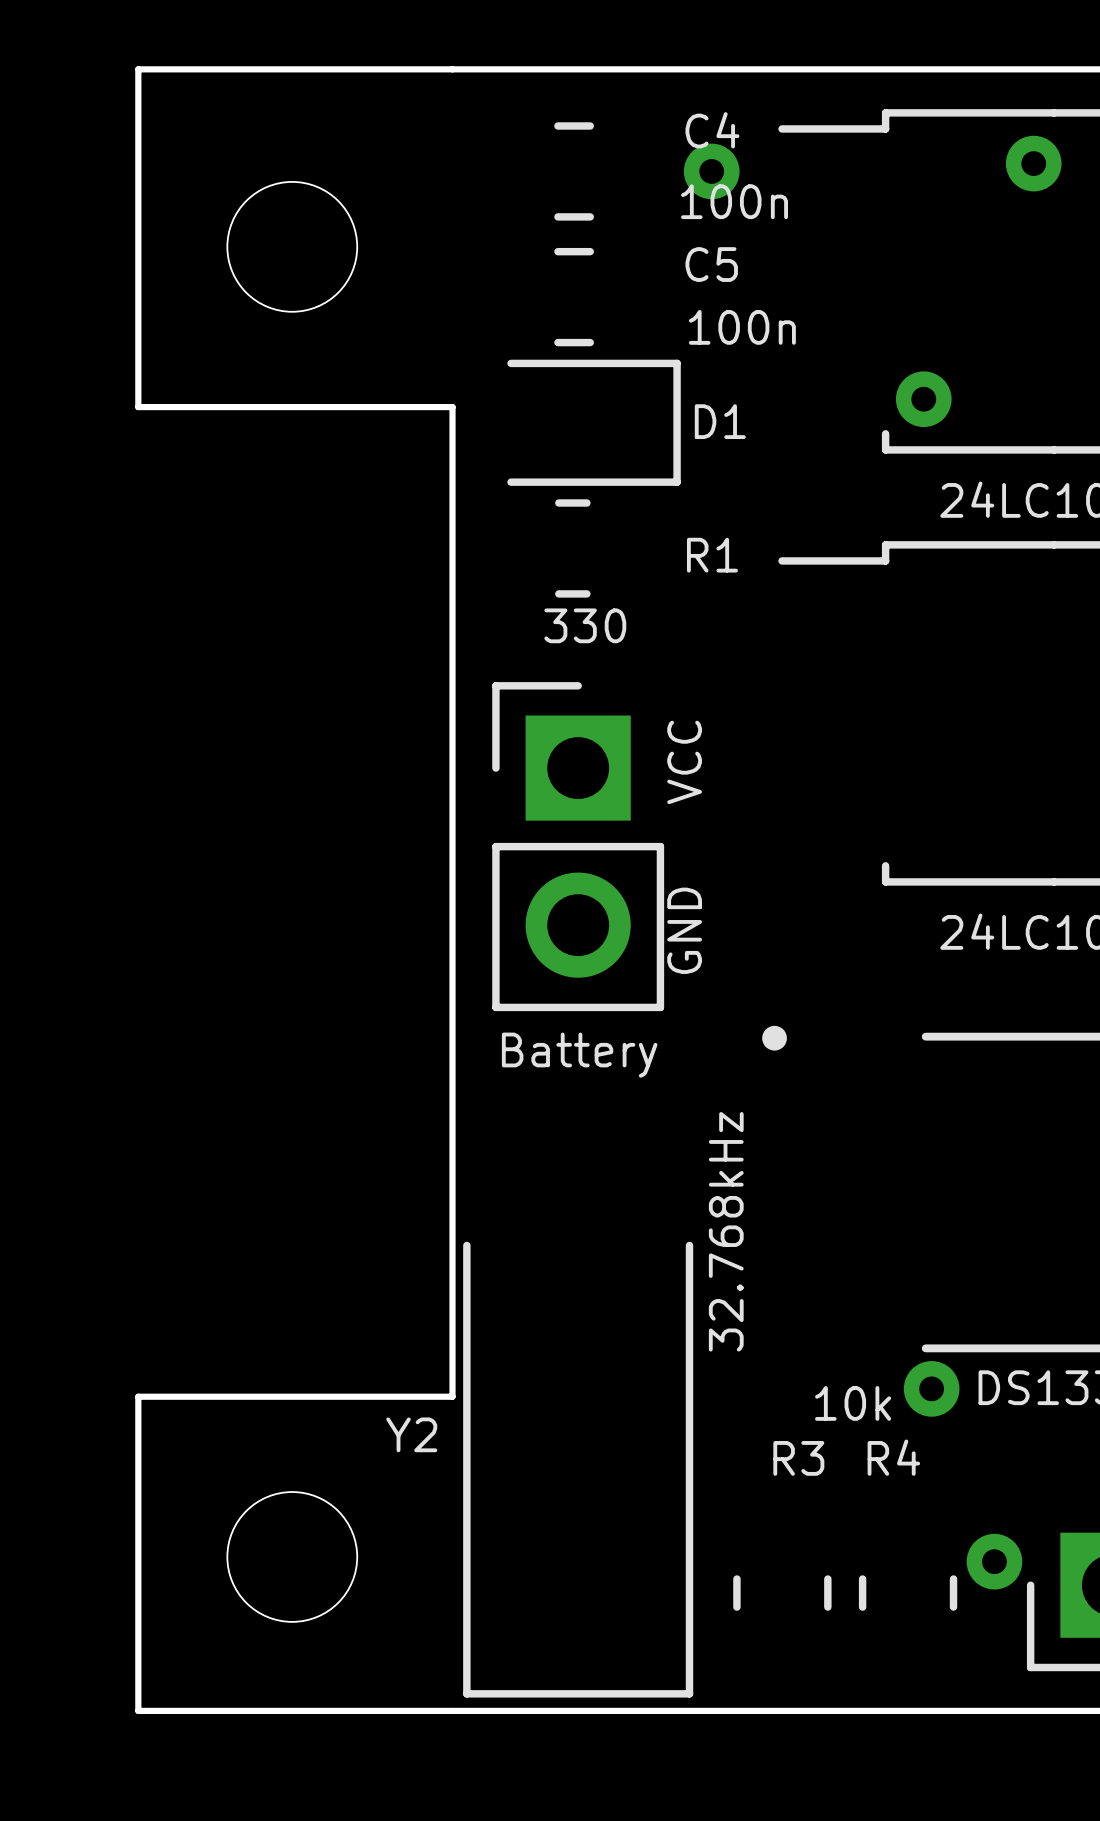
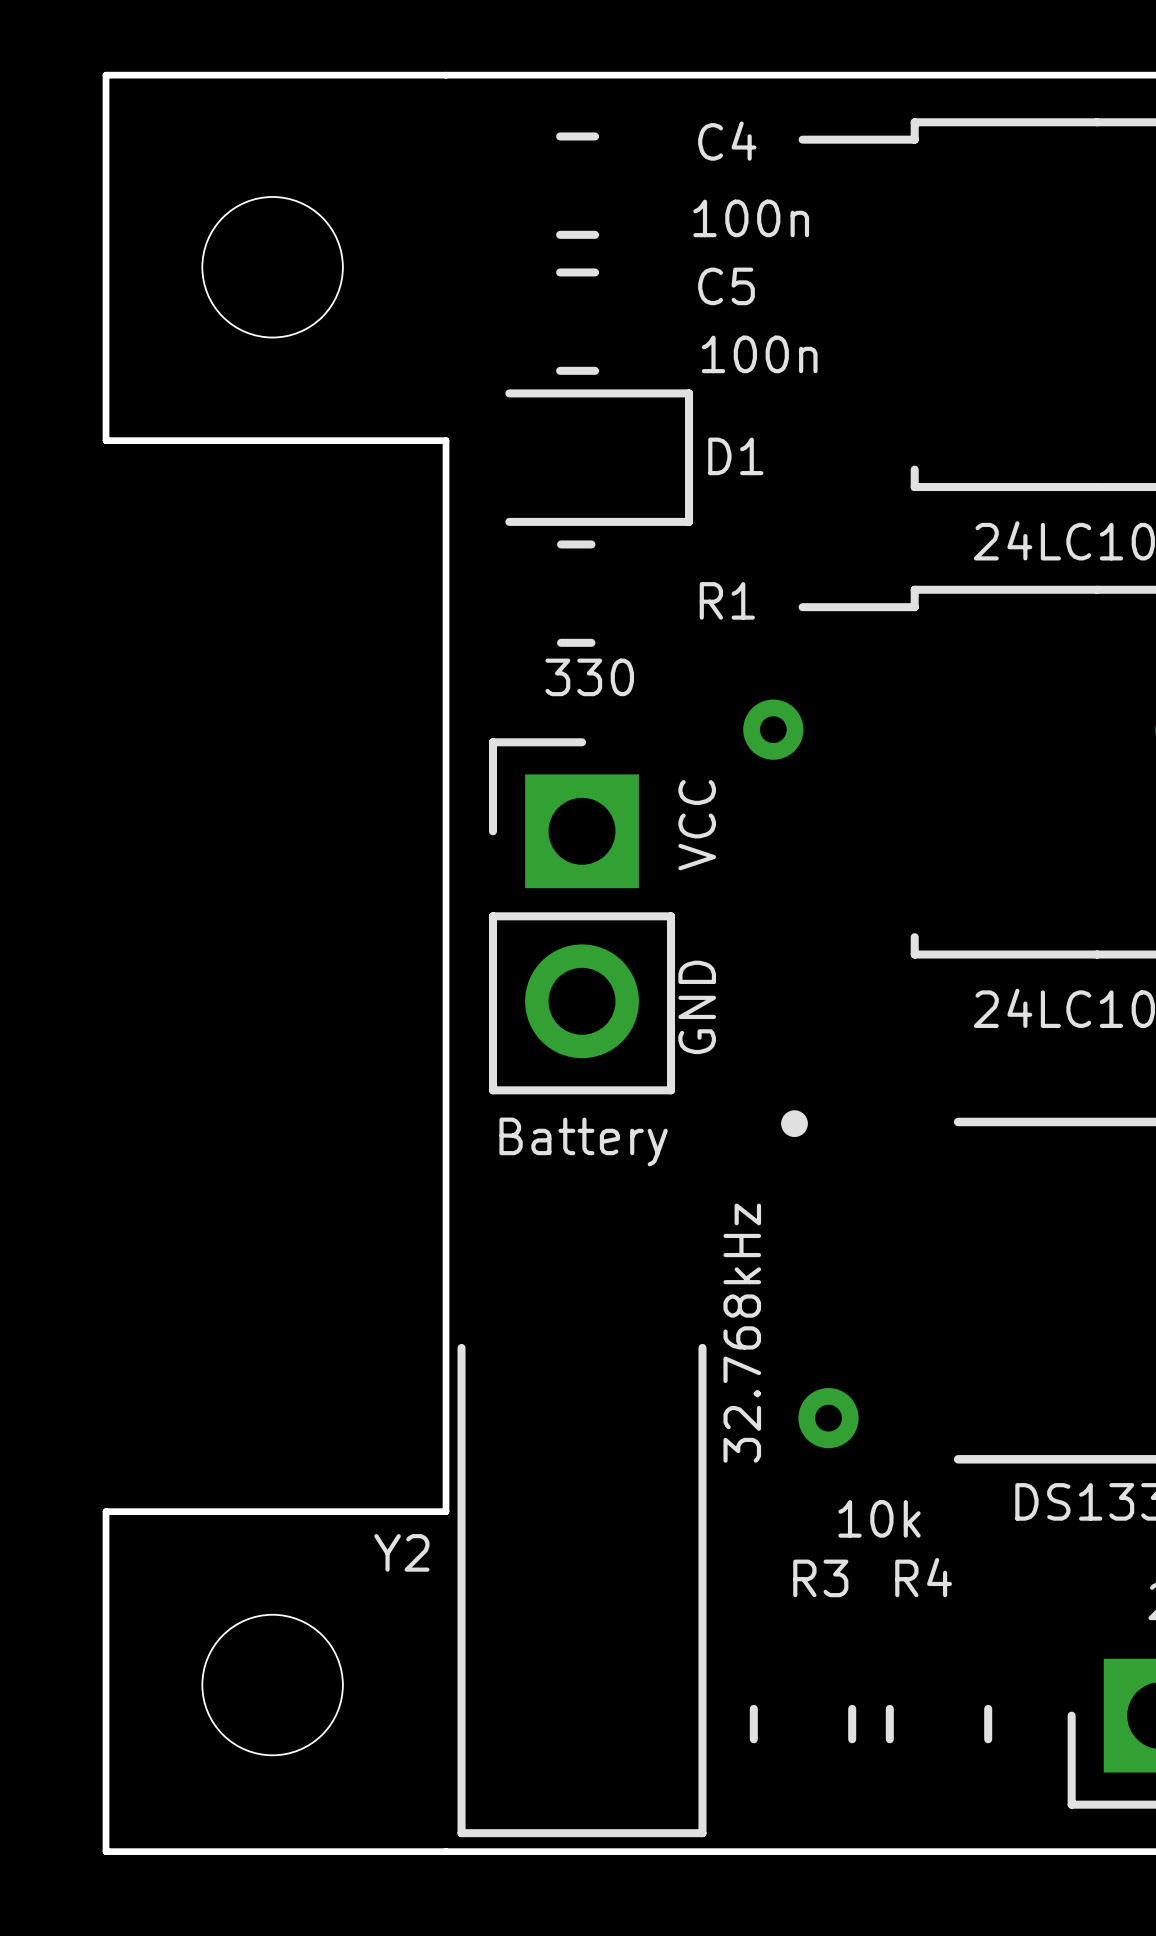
via: (1033, 163) -> none
via: (711, 171) -> none
via: (923, 399) -> none
via: none -> (773, 729)
via position: (931, 1388) -> (828, 1418)
via: (994, 1561) -> none

